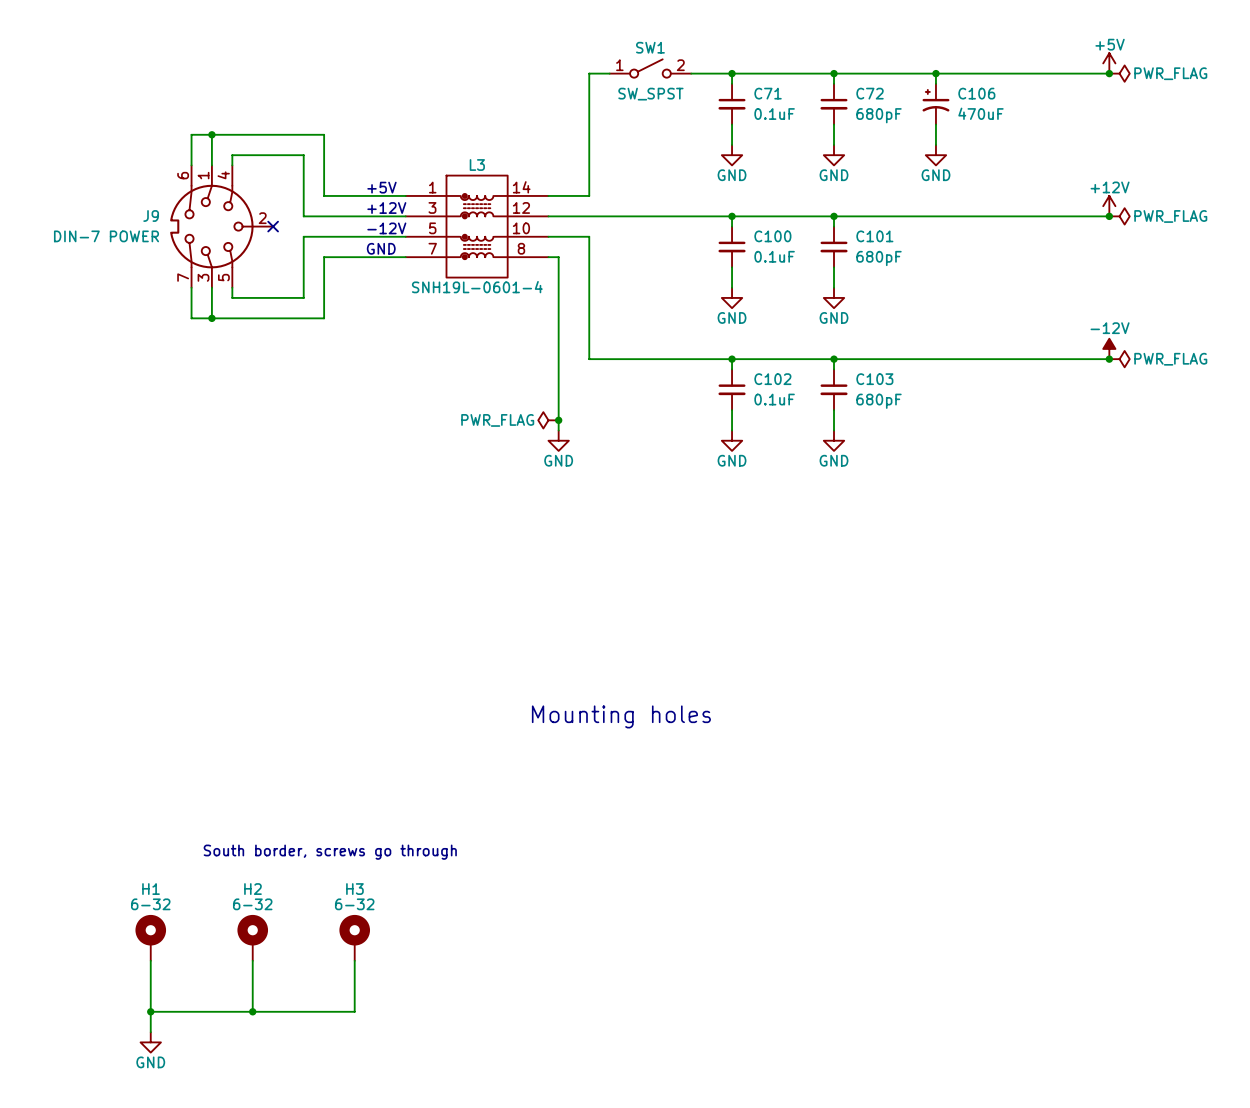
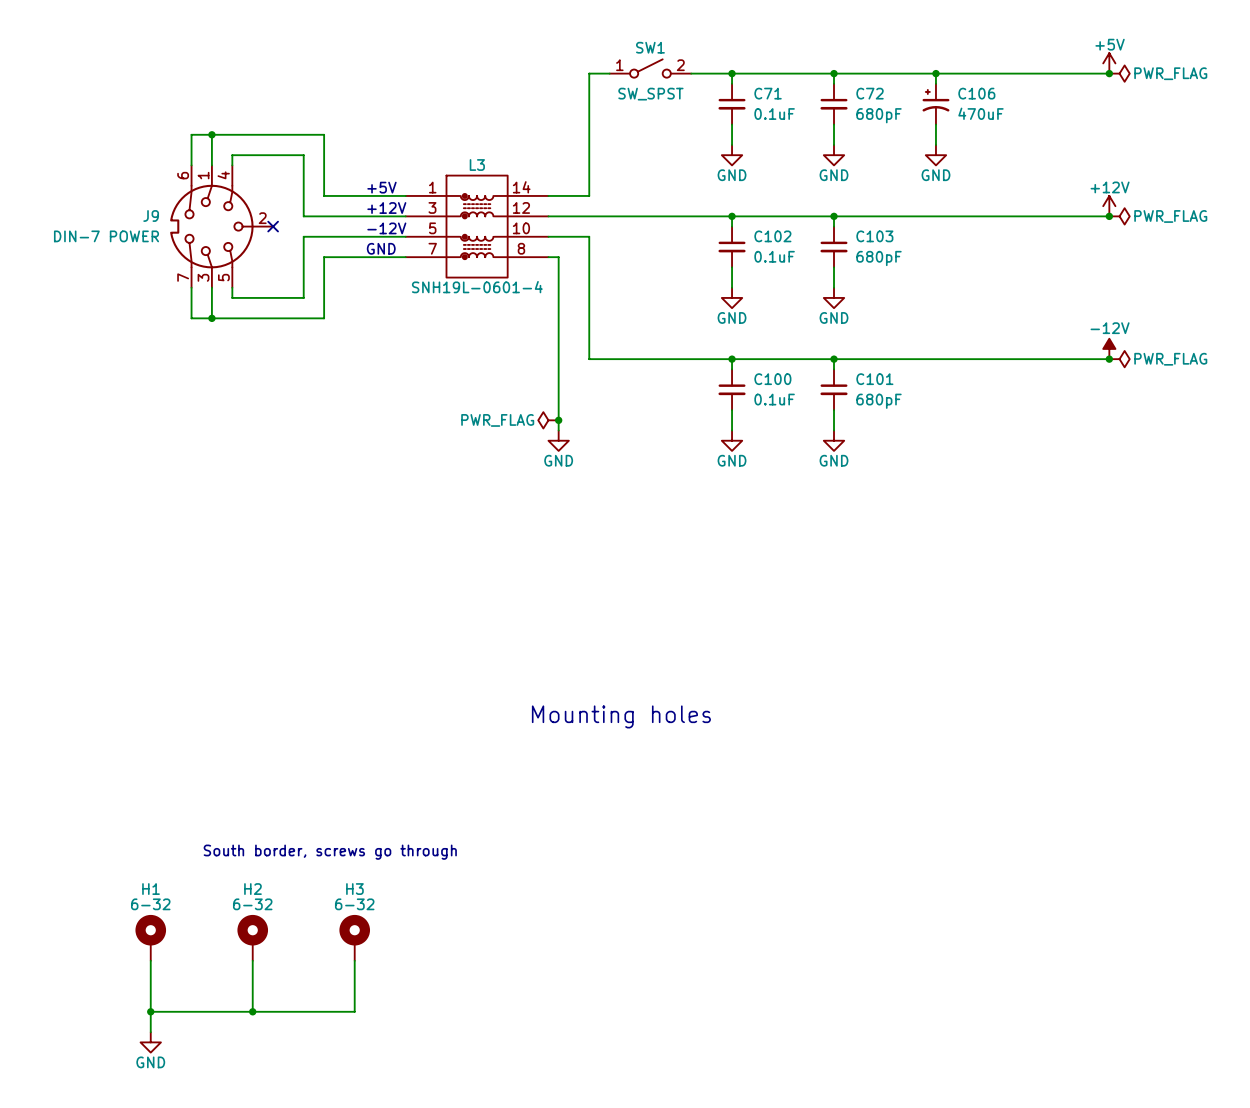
C100 name: C100 (772, 236) -> C102 (772, 236)
C101 name: C101 (874, 236) -> C103 (874, 236)
C102 name: C102 (772, 379) -> C100 (772, 379)
C103 name: C103 (874, 379) -> C101 (874, 379)

